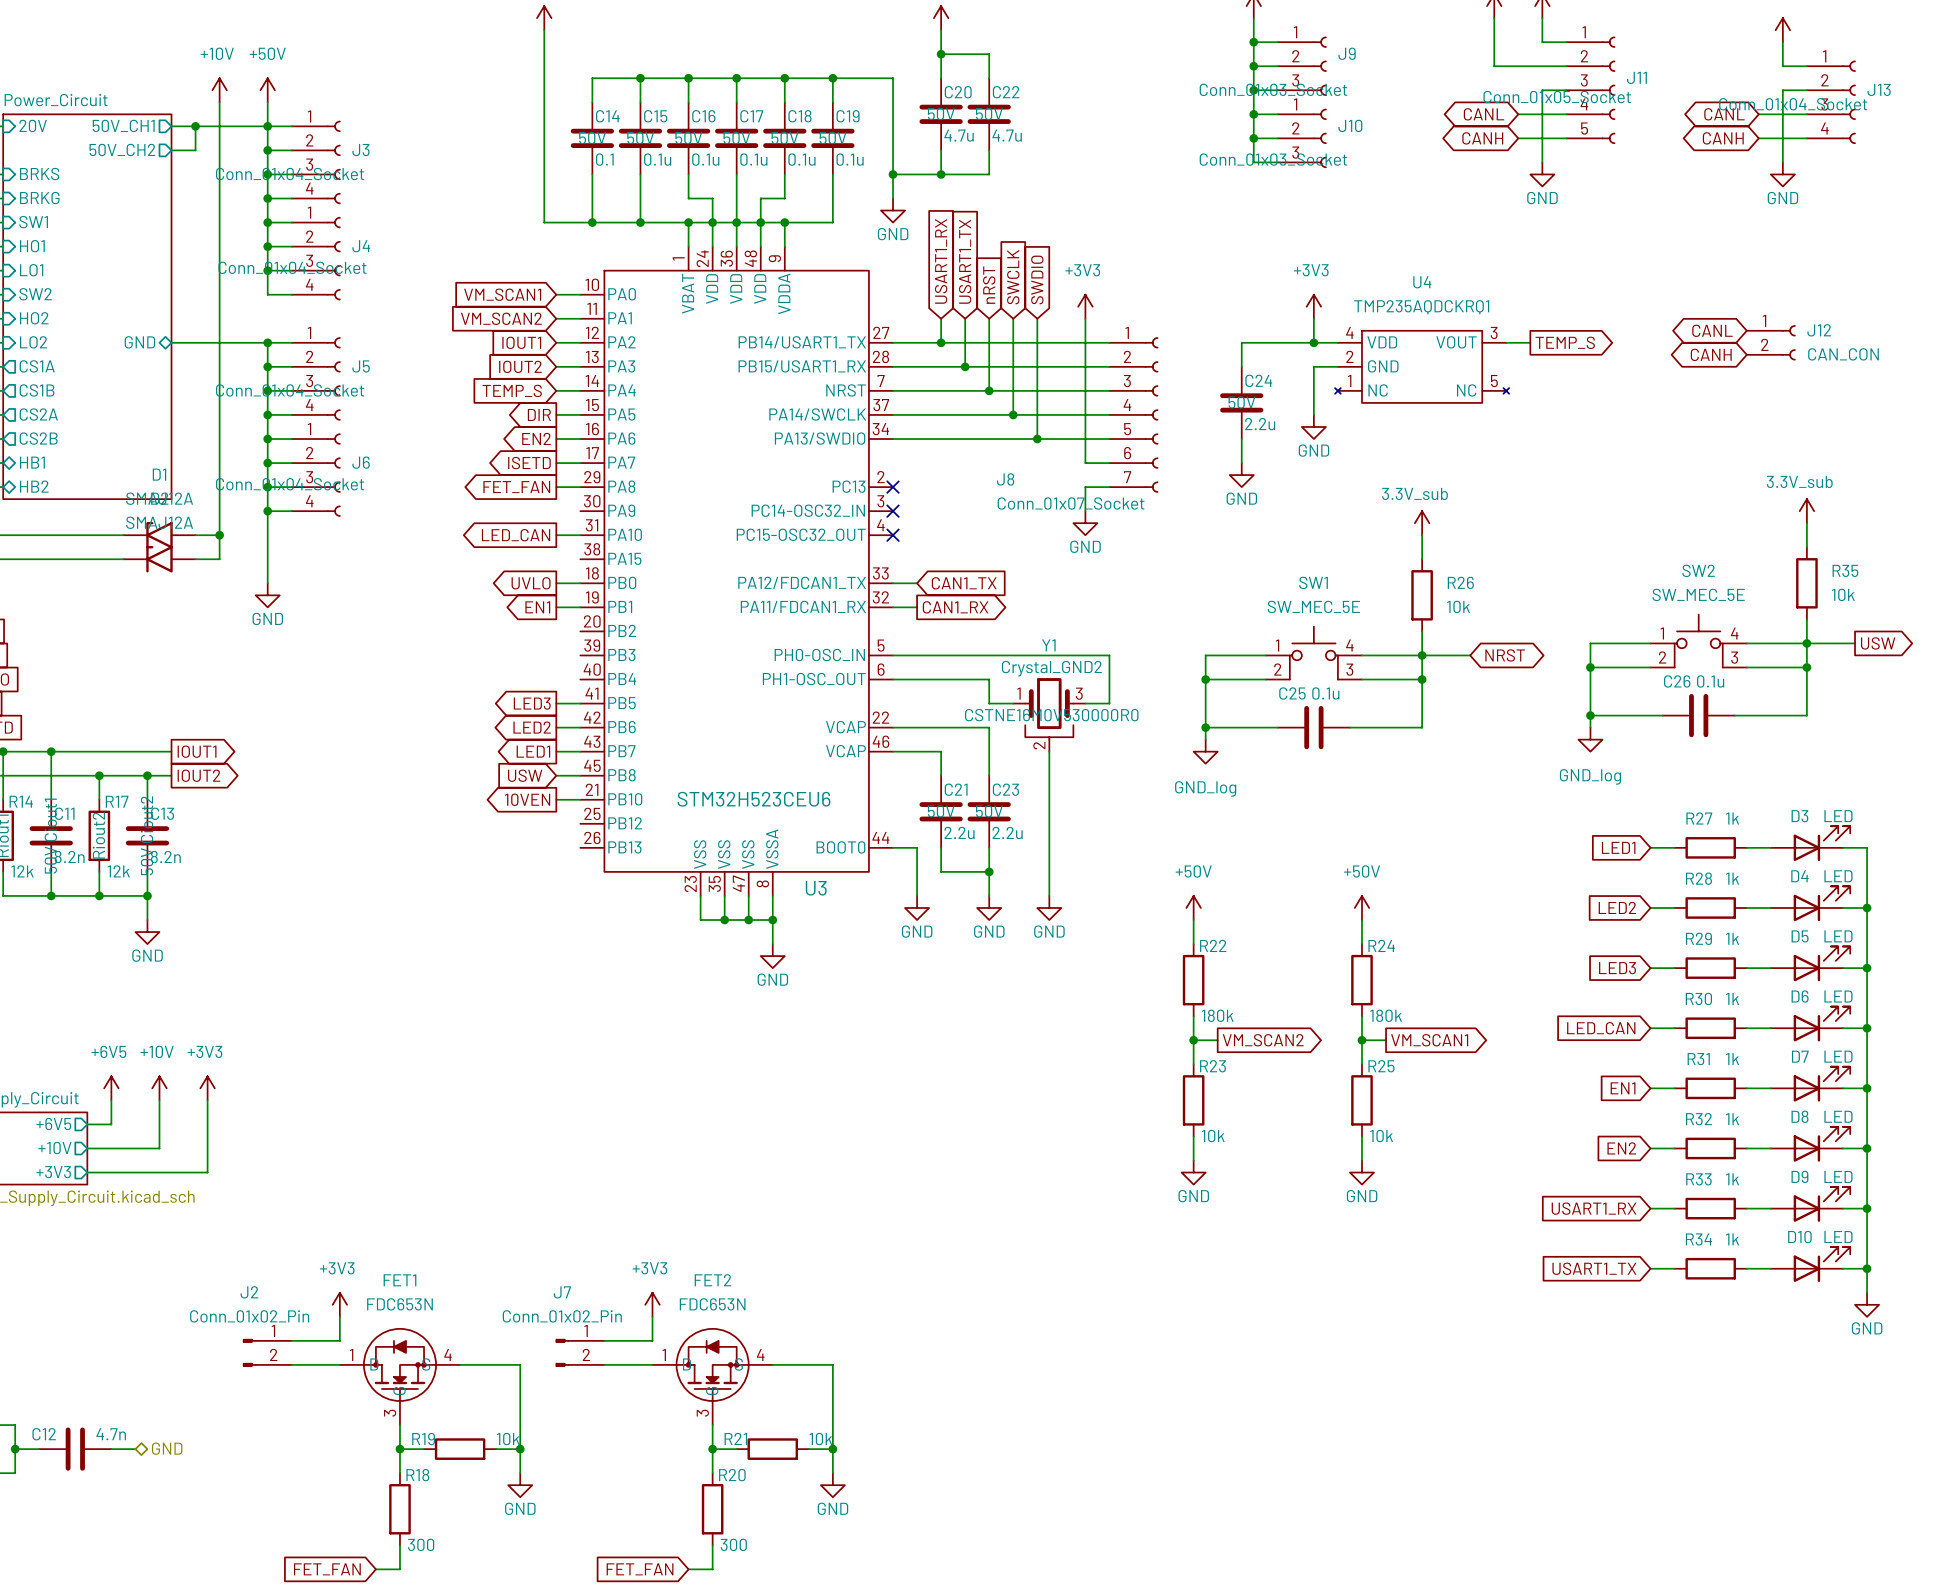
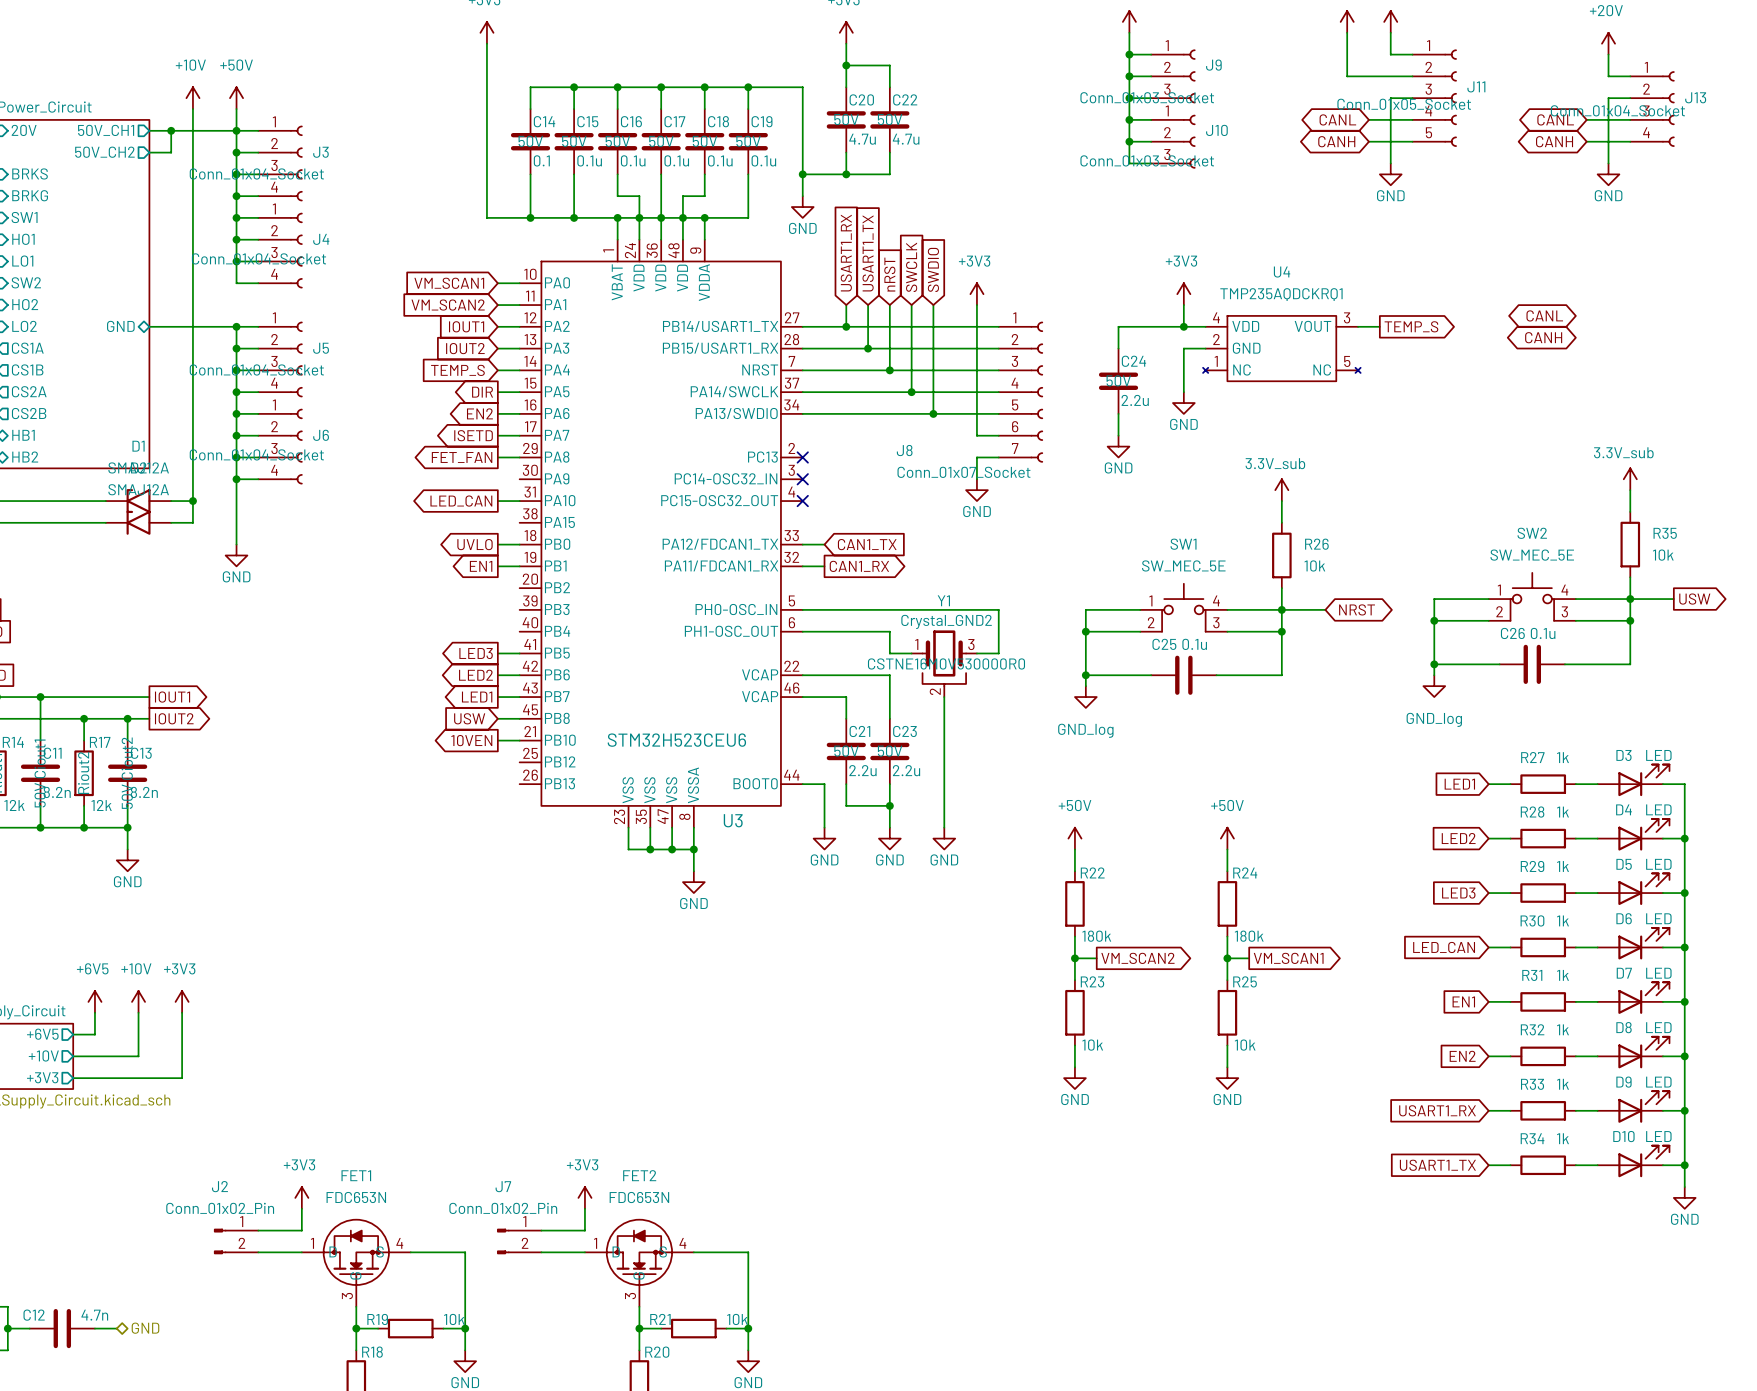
J12: CAN_CON (1771, 342) -> none

